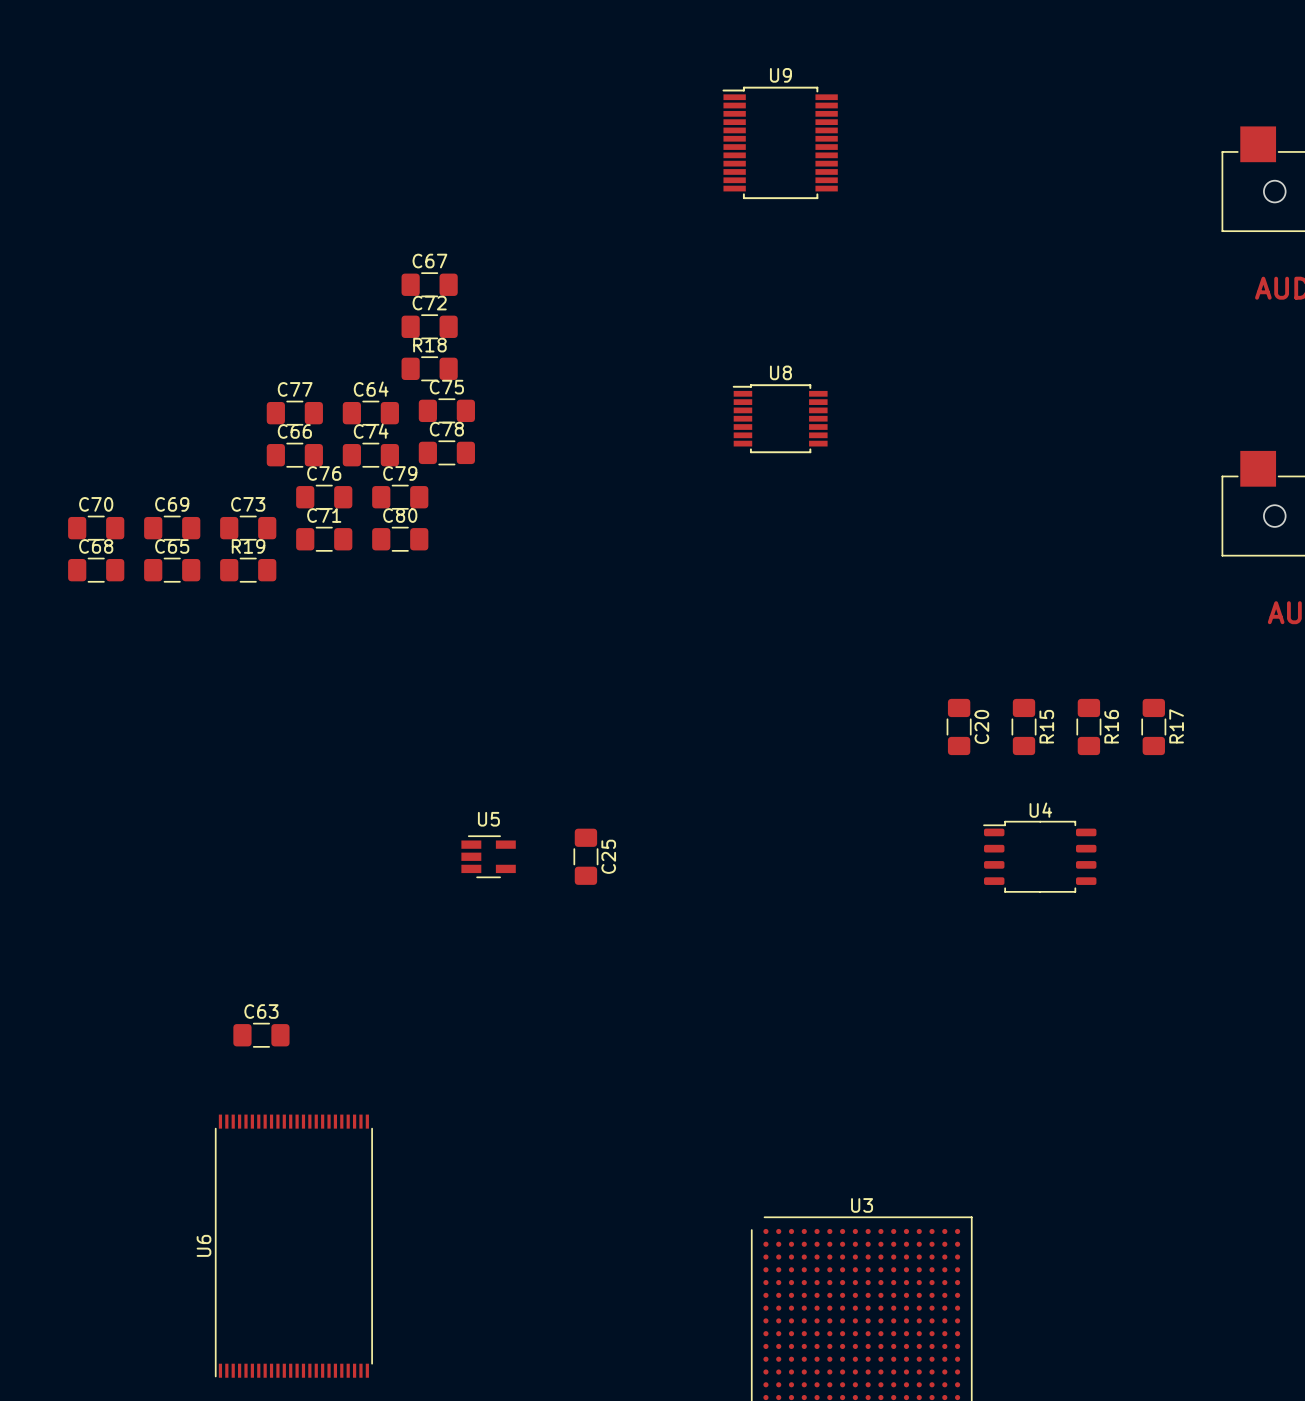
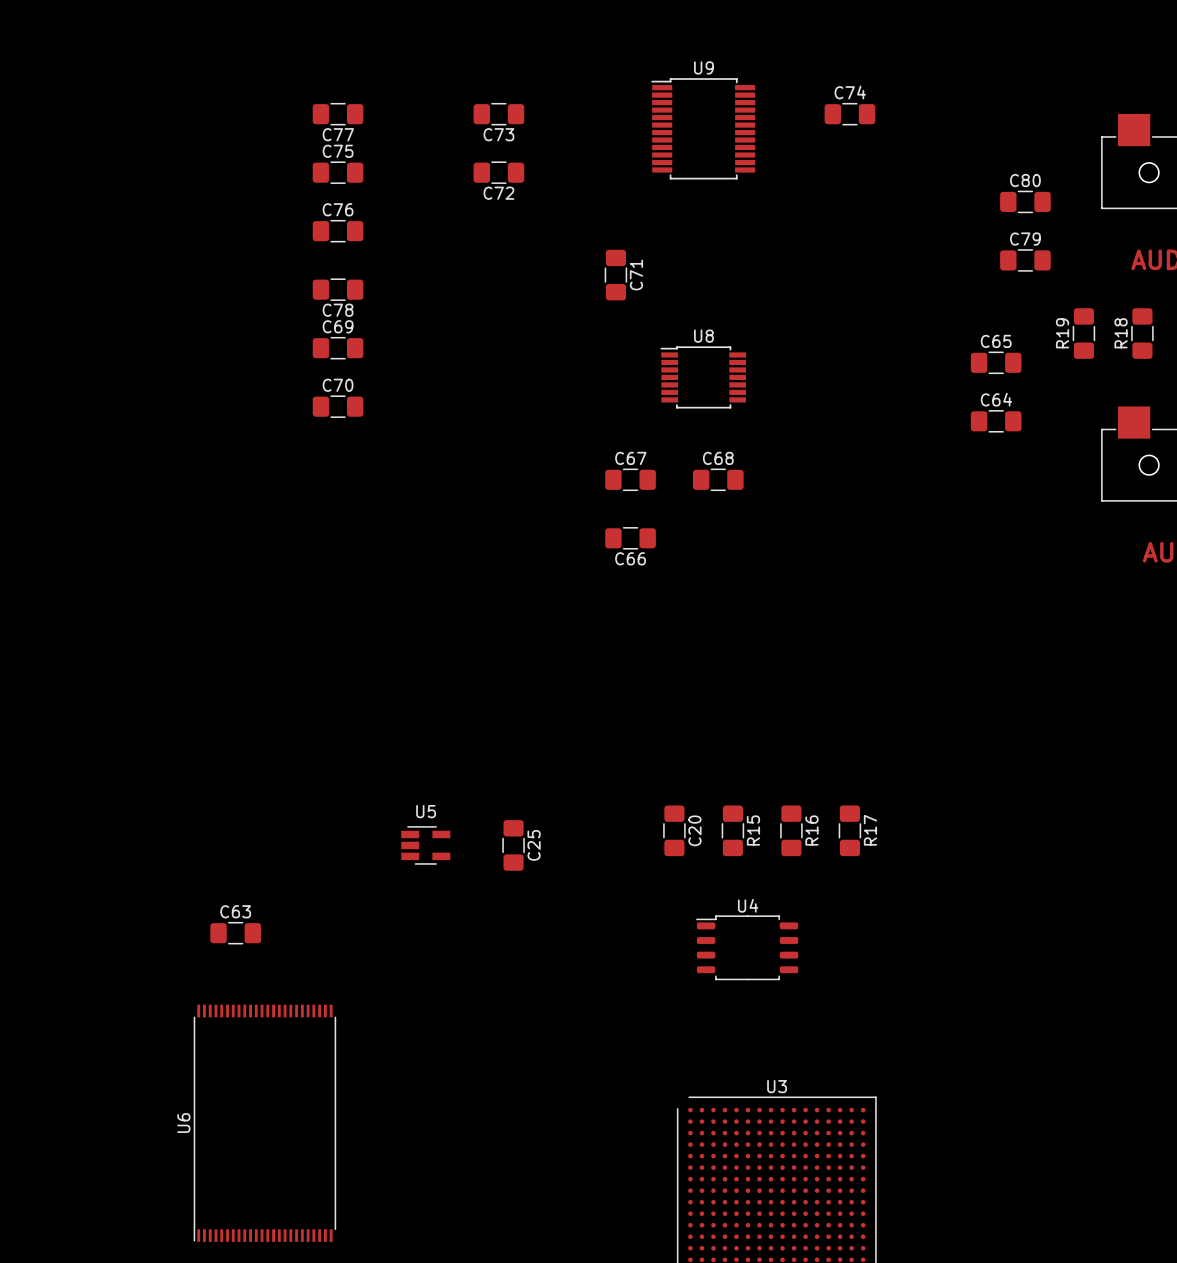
C67 position: (429, 284) -> (630, 479)
C72 name position: C72 (429, 303) -> C72 (498, 193)
C72 position: (429, 326) -> (498, 172)
R18 name position: R18 (429, 345) -> R18 (1121, 333)
R18 rotation: 0° (429, 368) -> 90° clockwise (1142, 333)
R18 position: (429, 368) -> (1142, 333)
C77 name position: C77 (295, 389) -> C77 (338, 134)
C75 position: (446, 410) -> (338, 172)
C77 position: (294, 413) -> (338, 114)
C64 position: (370, 413) -> (996, 421)
C78 name position: C78 (446, 429) -> C78 (338, 310)
C66 name position: C66 (294, 431) -> C66 (630, 558)
C78 position: (446, 452) -> (338, 289)
C66 position: (294, 455) -> (630, 538)
C74 position: (370, 455) -> (849, 114)
C76 position: (324, 497) -> (338, 231)
C79 position: (400, 497) -> (1025, 260)
C73 name position: C73 (248, 504) -> C73 (498, 134)
C70 position: (96, 528) -> (338, 406)
C69 position: (172, 528) -> (338, 348)
C73 position: (248, 528) -> (498, 114)
C71 rotation: 0° (324, 539) -> 90° clockwise (615, 275)
C71 position: (324, 539) -> (615, 275)
C80 position: (400, 539) -> (1025, 201)
R19 name position: R19 (248, 546) -> R19 (1062, 333)
C68 position: (96, 570) -> (718, 479)
C65 position: (172, 570) -> (996, 362)
R19 rotation: 0° (248, 570) -> 90° clockwise (1083, 333)
R19 position: (248, 570) -> (1083, 333)
C20 position: (959, 726) -> (674, 830)
R15 position: (1024, 726) -> (732, 830)
R16 position: (1088, 726) -> (791, 830)
R17 position: (1153, 726) -> (849, 830)
U5 position: (488, 856) -> (425, 845)
C25 position: (585, 856) -> (513, 845)
U4 position: (1039, 856) -> (747, 947)

